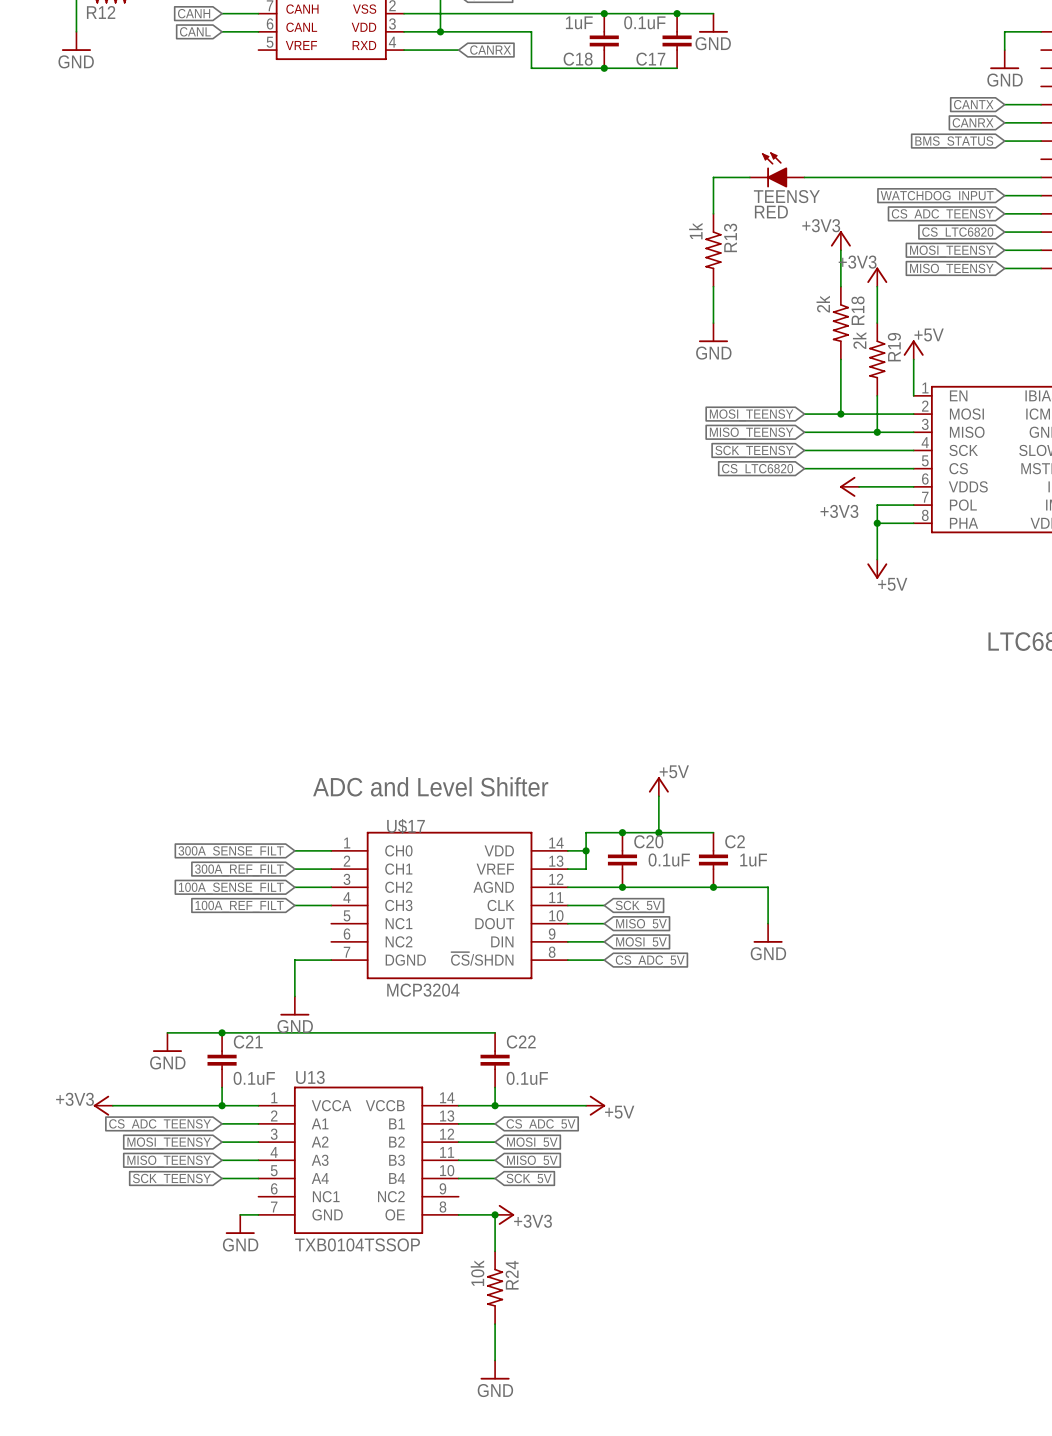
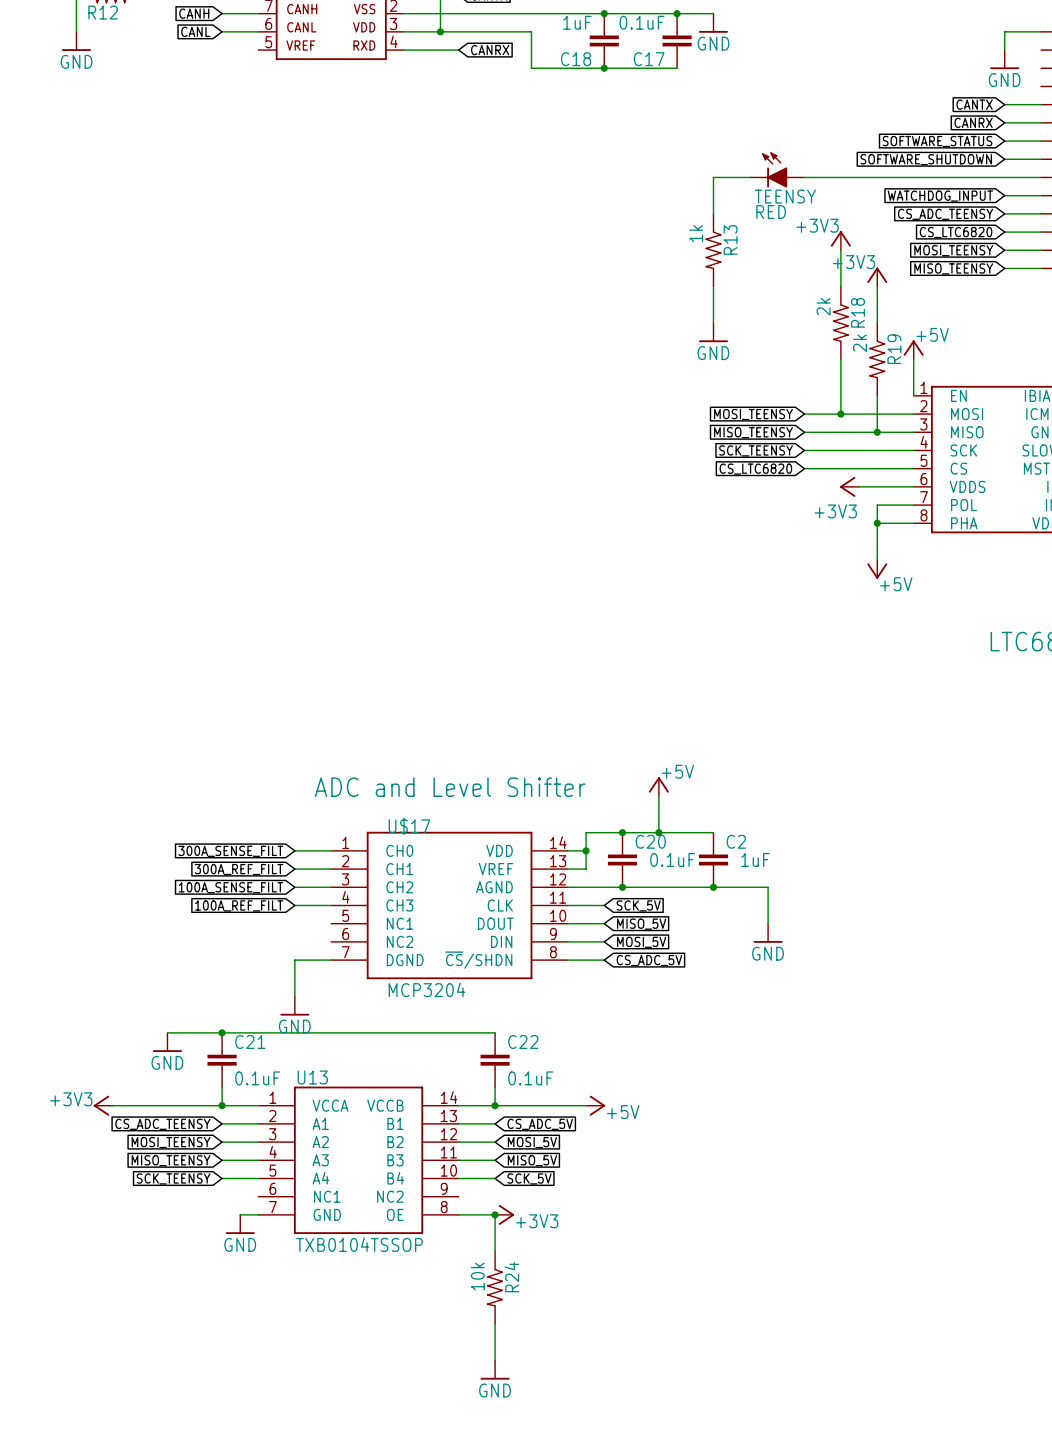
global label: BMS_STATUS (954, 142) -> SOFTWARE_STATUS (937, 141)
wire: none -> (1004, 159) (1041, 159)
global label: none -> SOFTWARE_SHUTDOWN (926, 159)

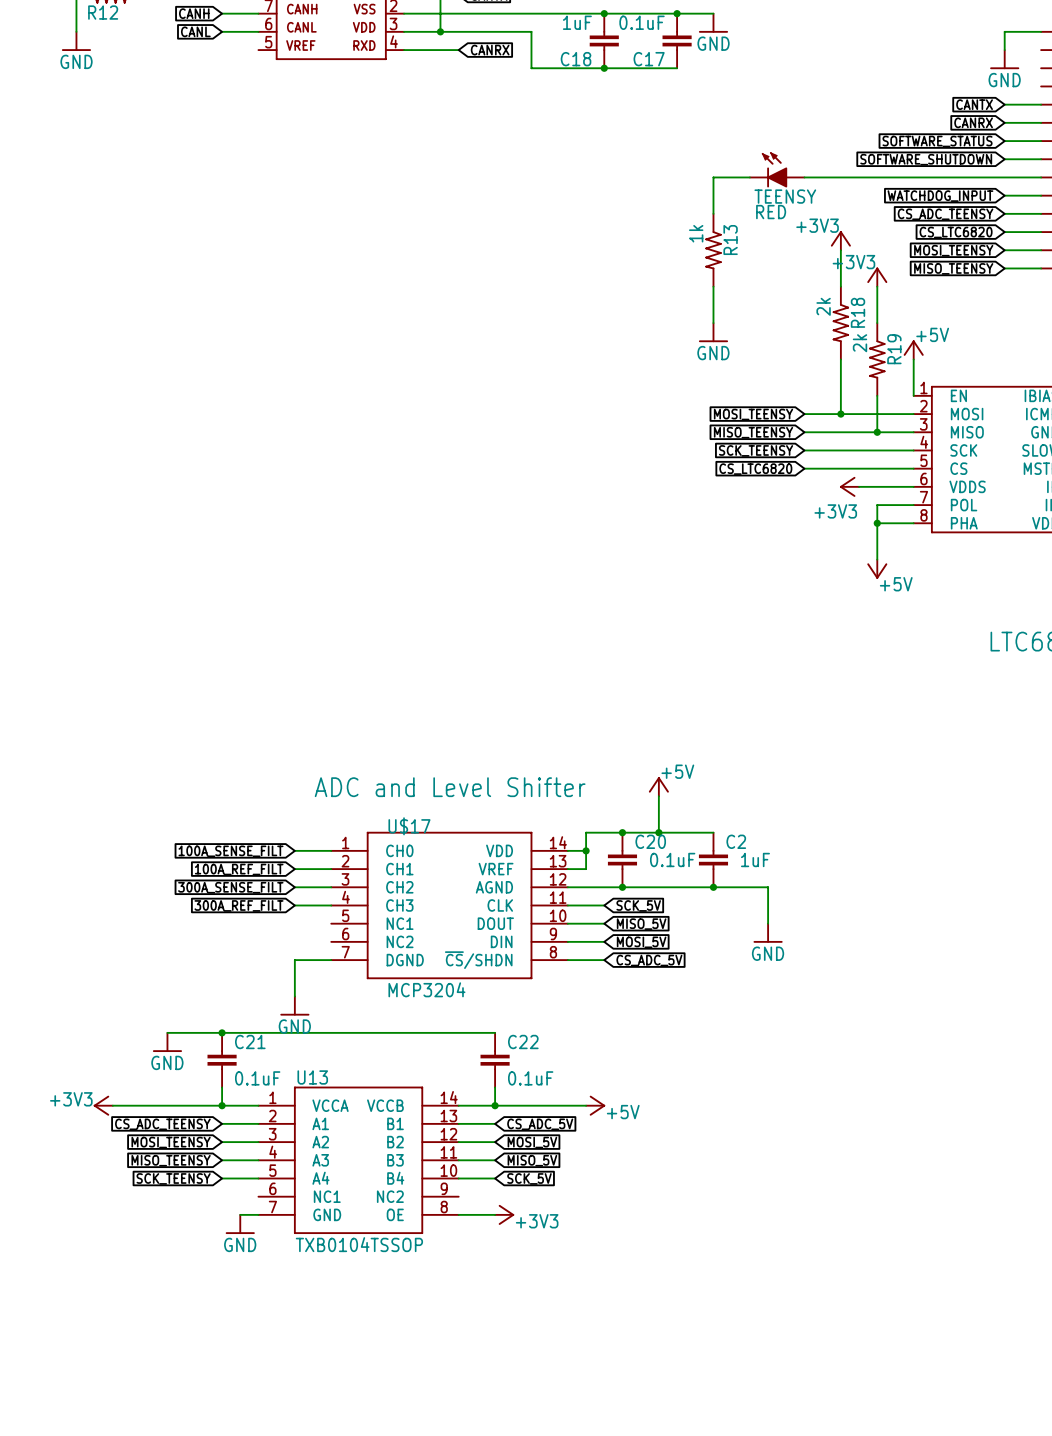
global label: 300A_SENSE_FILT (230, 851) -> 100A_SENSE_FILT (231, 851)
global label: 300A_REF_FILT (239, 869) -> 100A_REF_FILT (239, 869)
global label: 100A_SENSE_FILT (231, 887) -> 300A_SENSE_FILT (230, 887)
global label: 100A_REF_FILT (239, 905) -> 300A_REF_FILT (239, 905)
wire: (495, 1214) (495, 1251) -> none
junction: (495, 1214) -> none
R24: 10k (495, 1287) -> none
wire: (495, 1324) (495, 1360) -> none
power symbol: GND (495, 1370) -> none

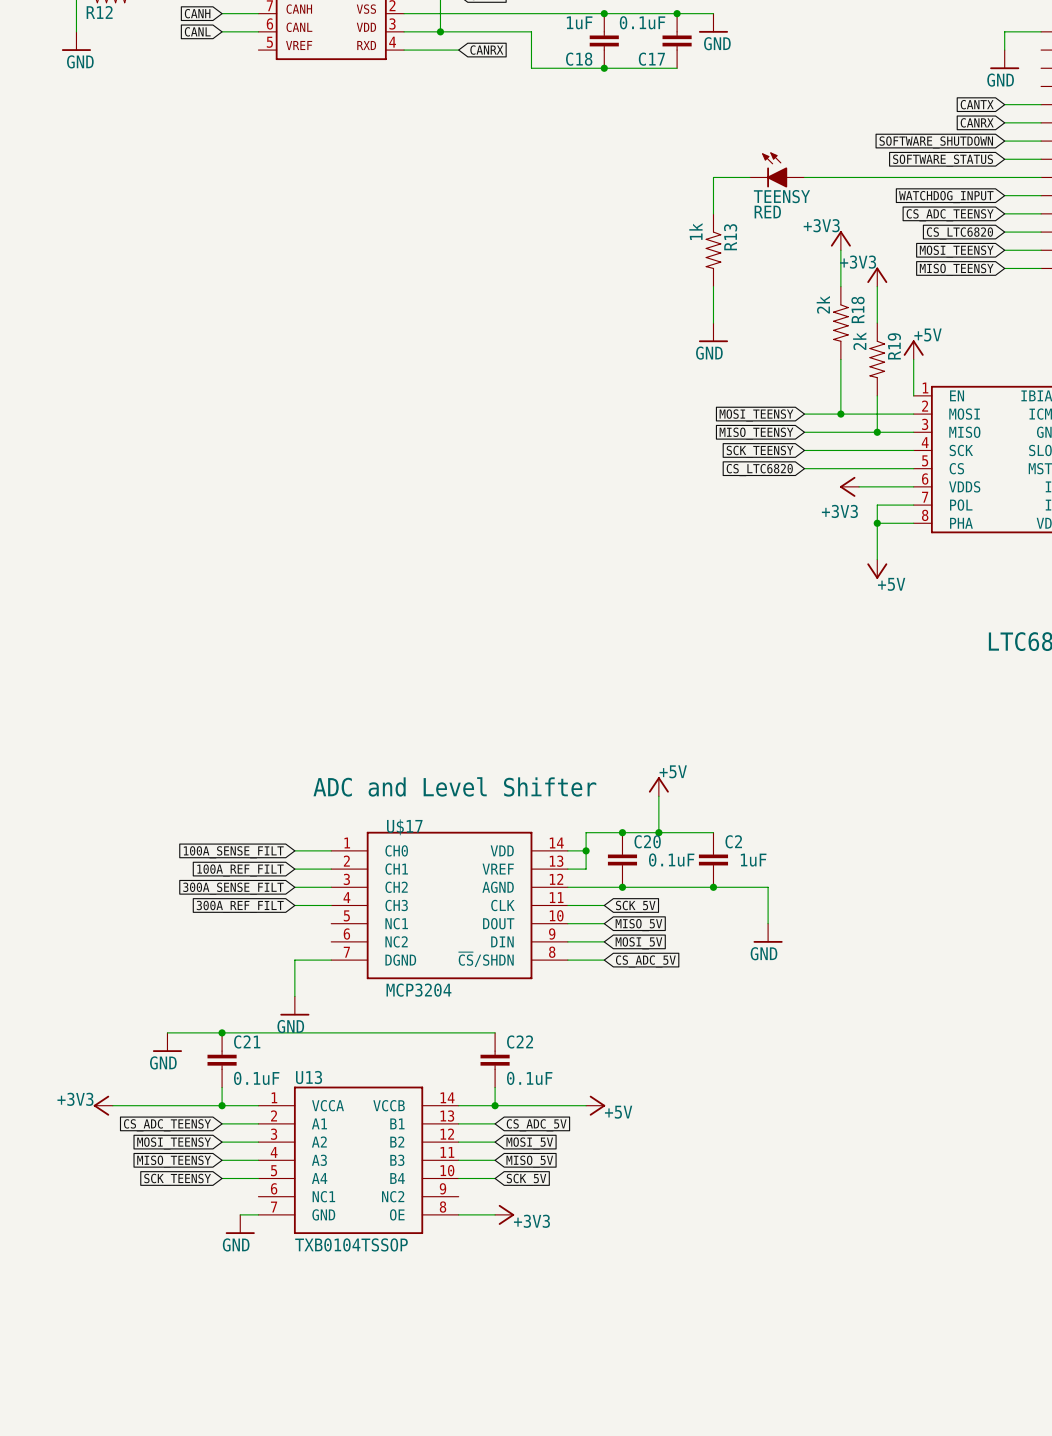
global label: SOFTWARE_STATUS (937, 141) -> SOFTWARE_SHUTDOWN (936, 142)
global label: SOFTWARE_SHUTDOWN (926, 159) -> SOFTWARE_STATUS (943, 160)

